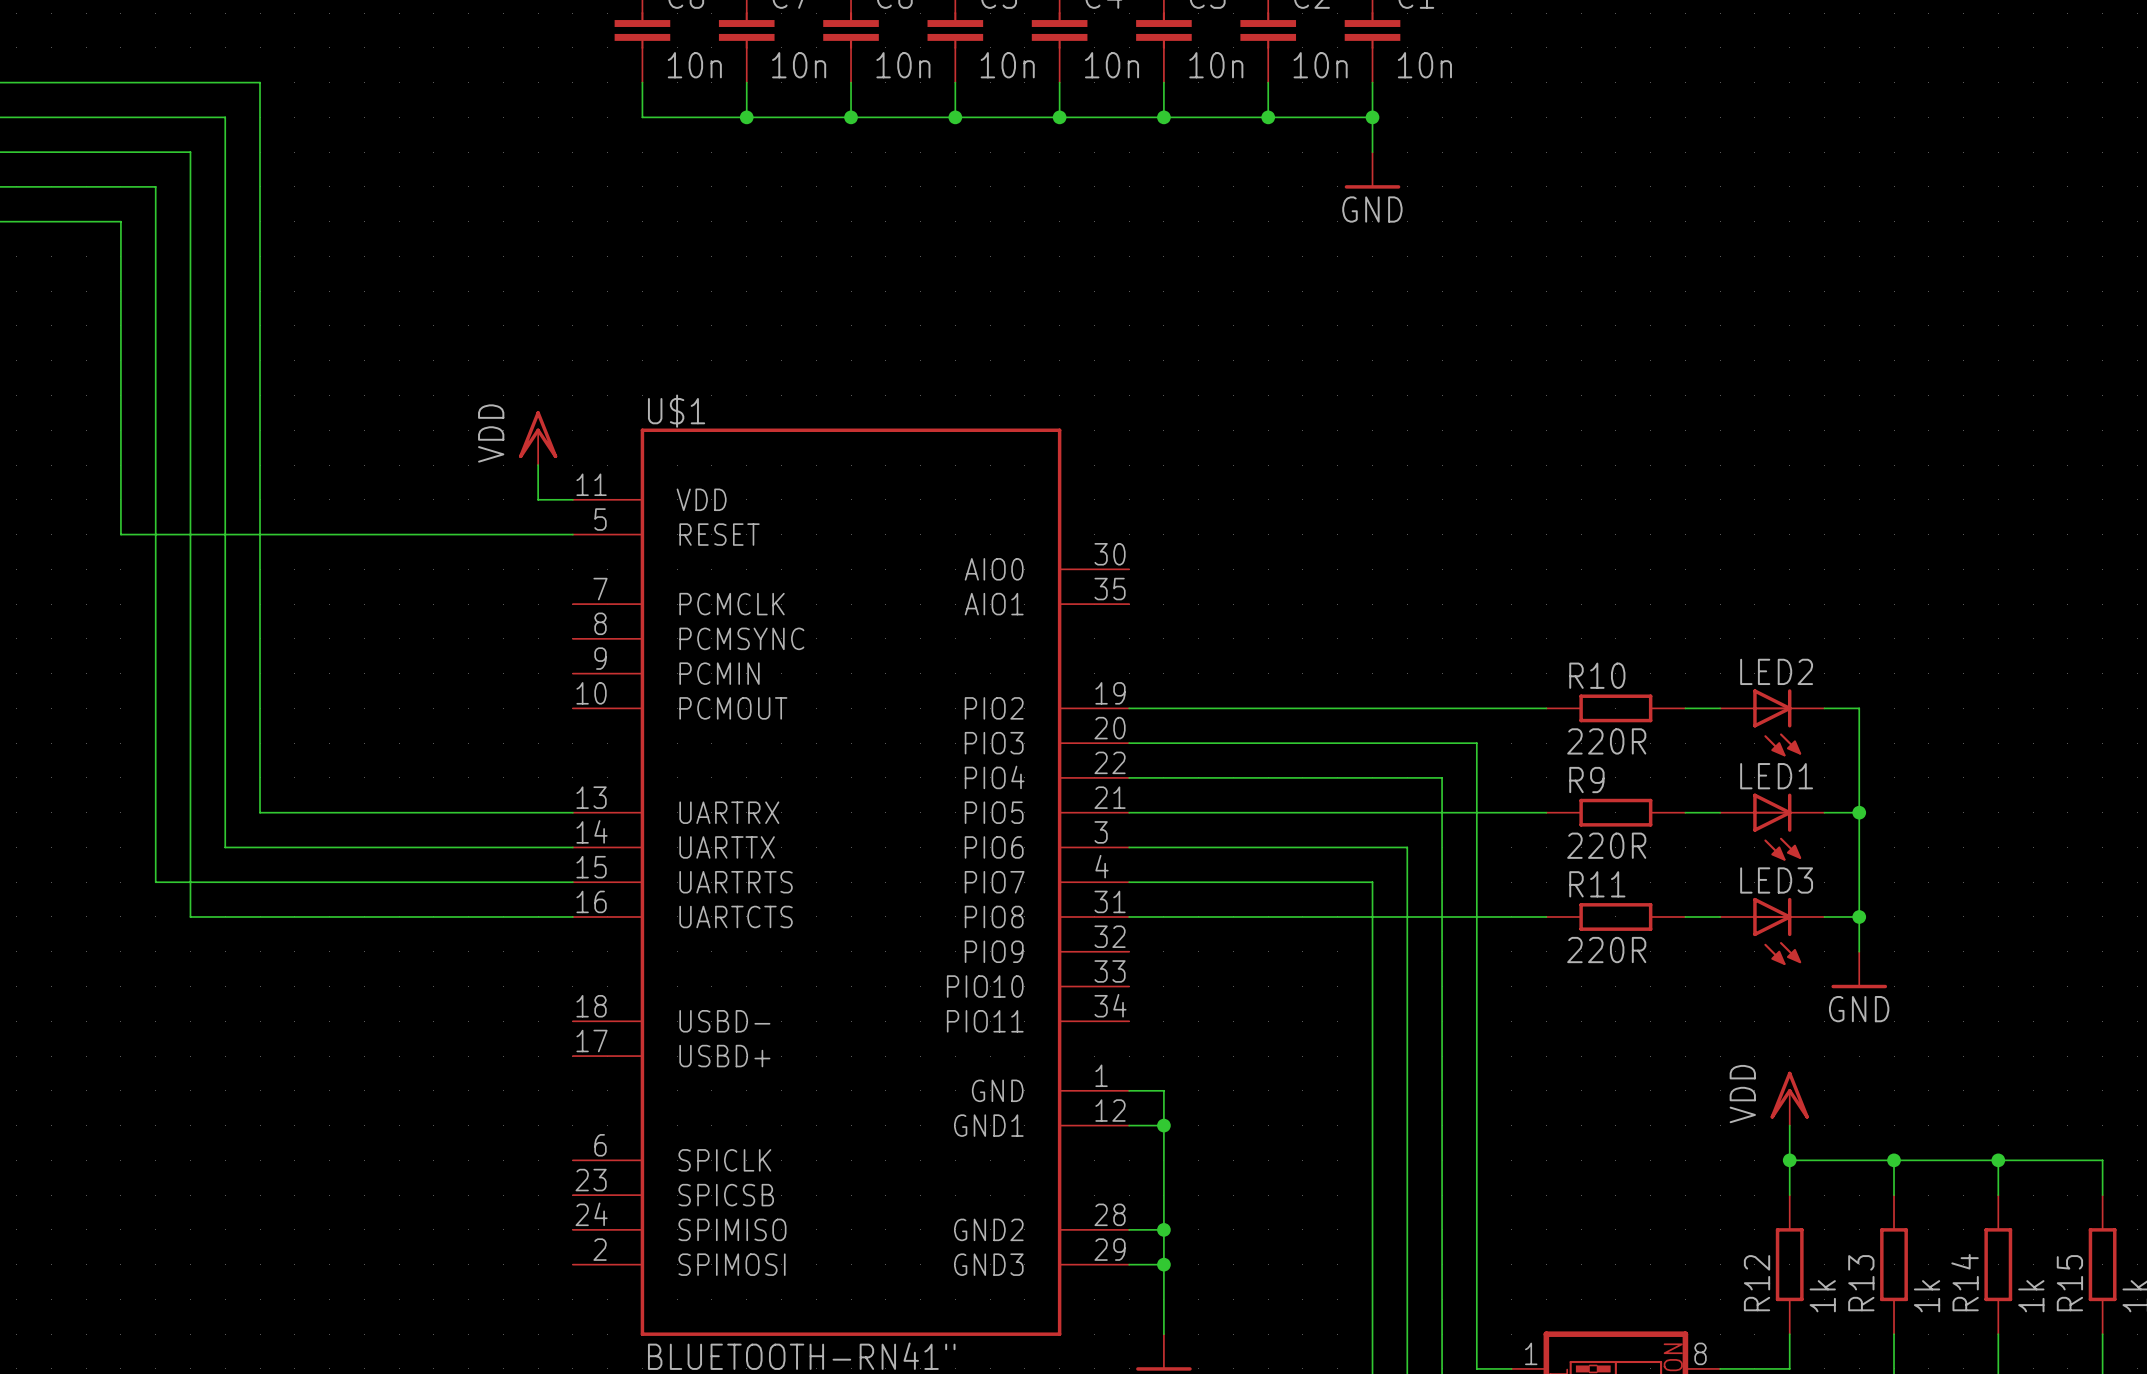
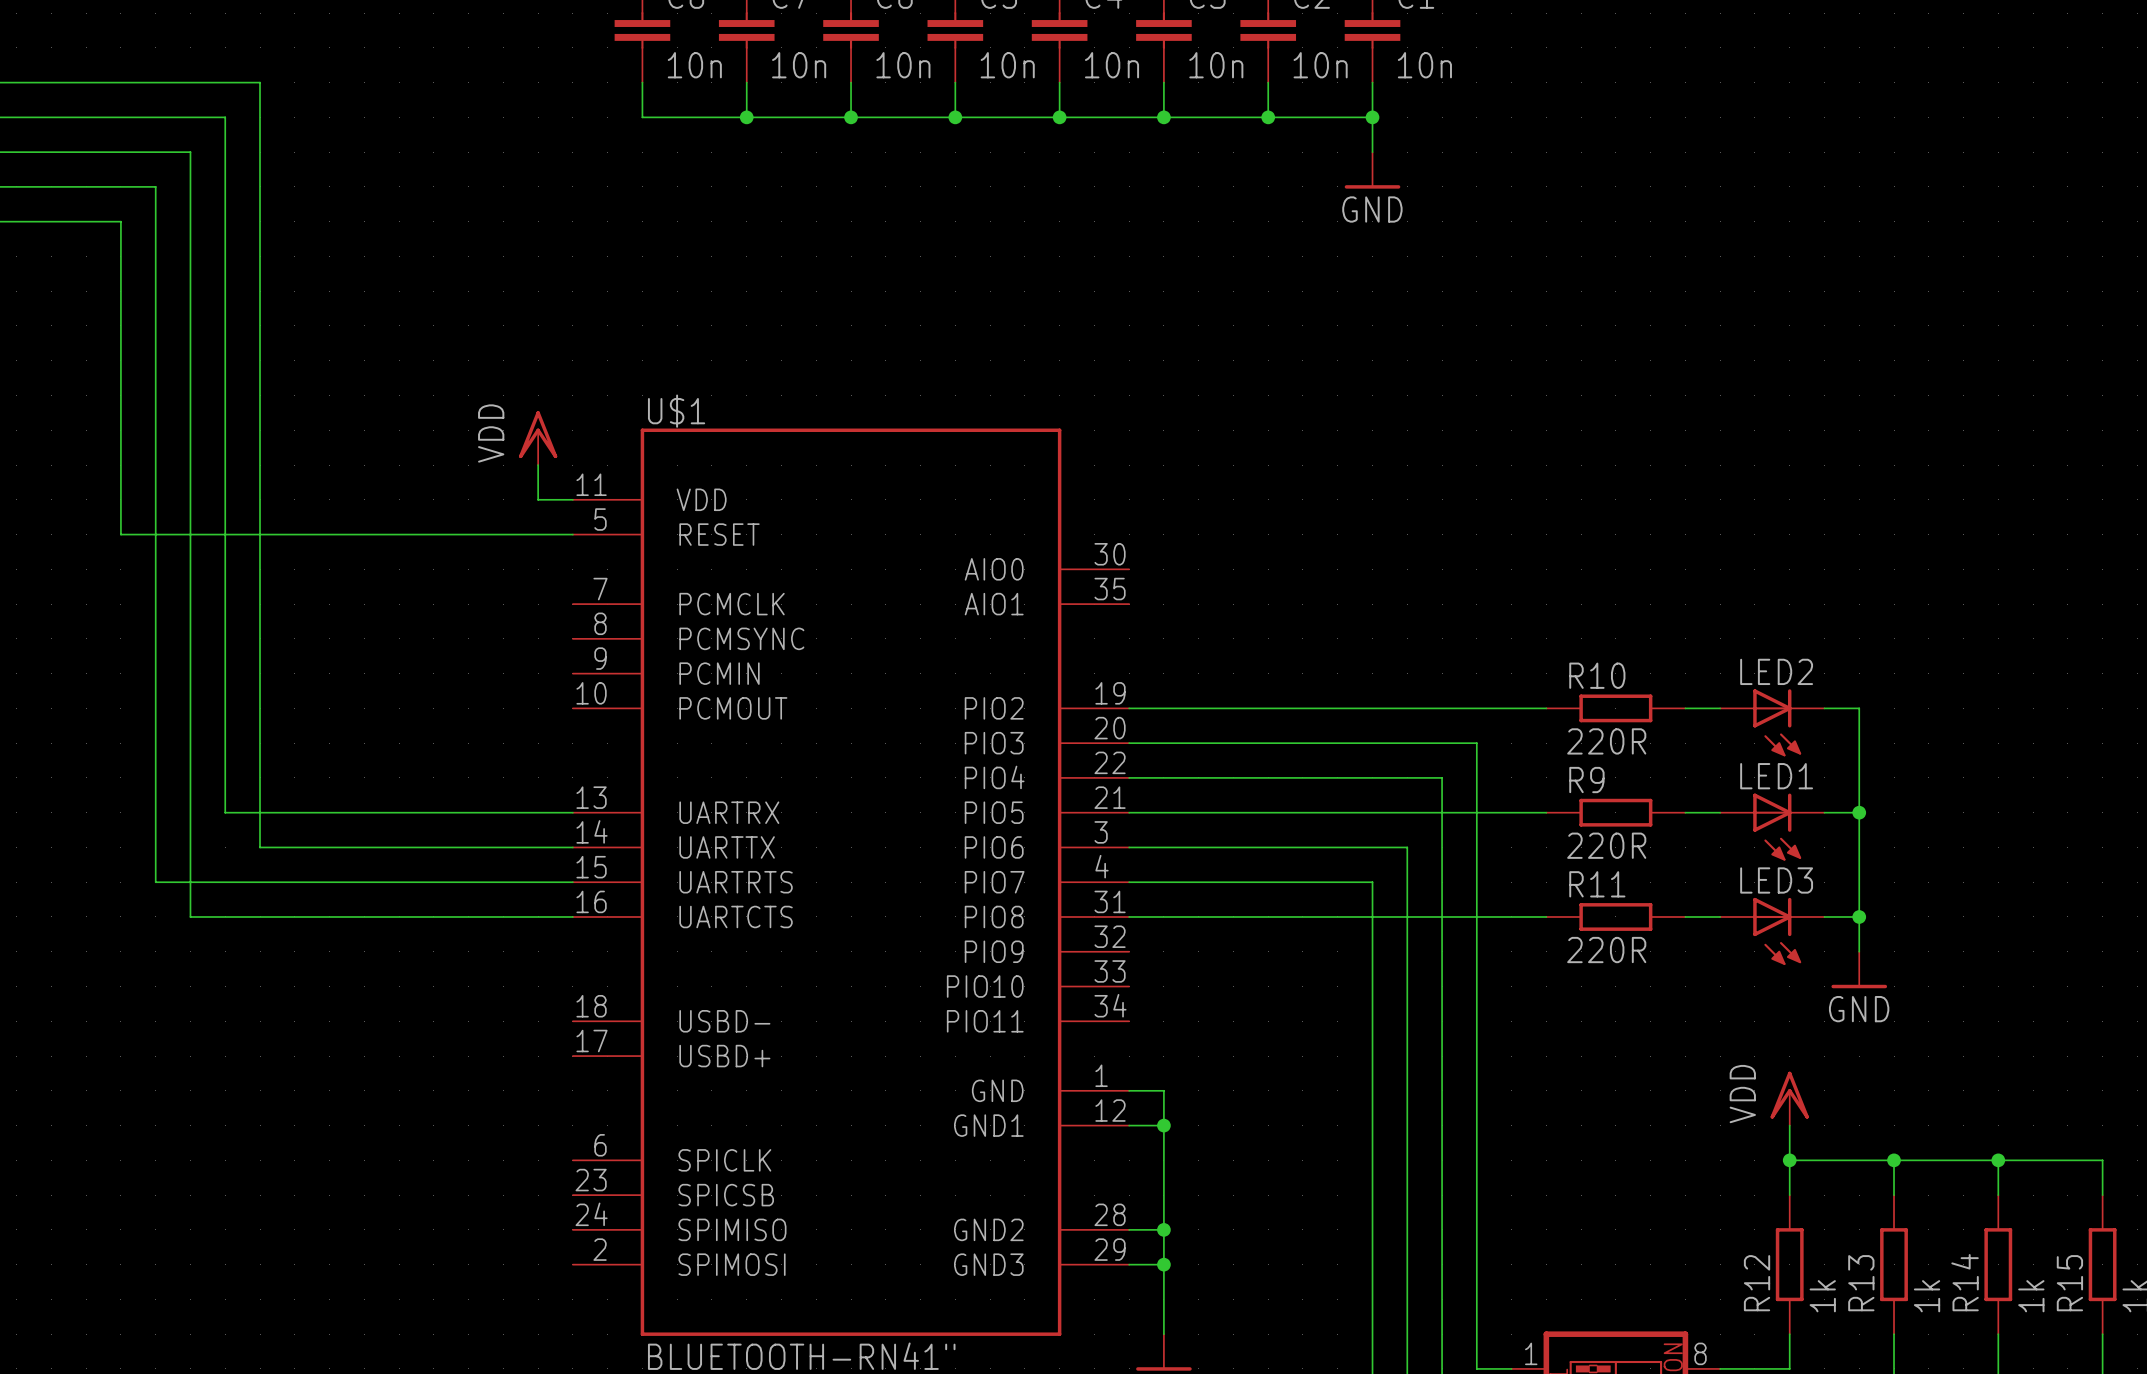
wire: (225, 812) (225, 847) (260, 847) -> (225, 812) (260, 812) (260, 847)

